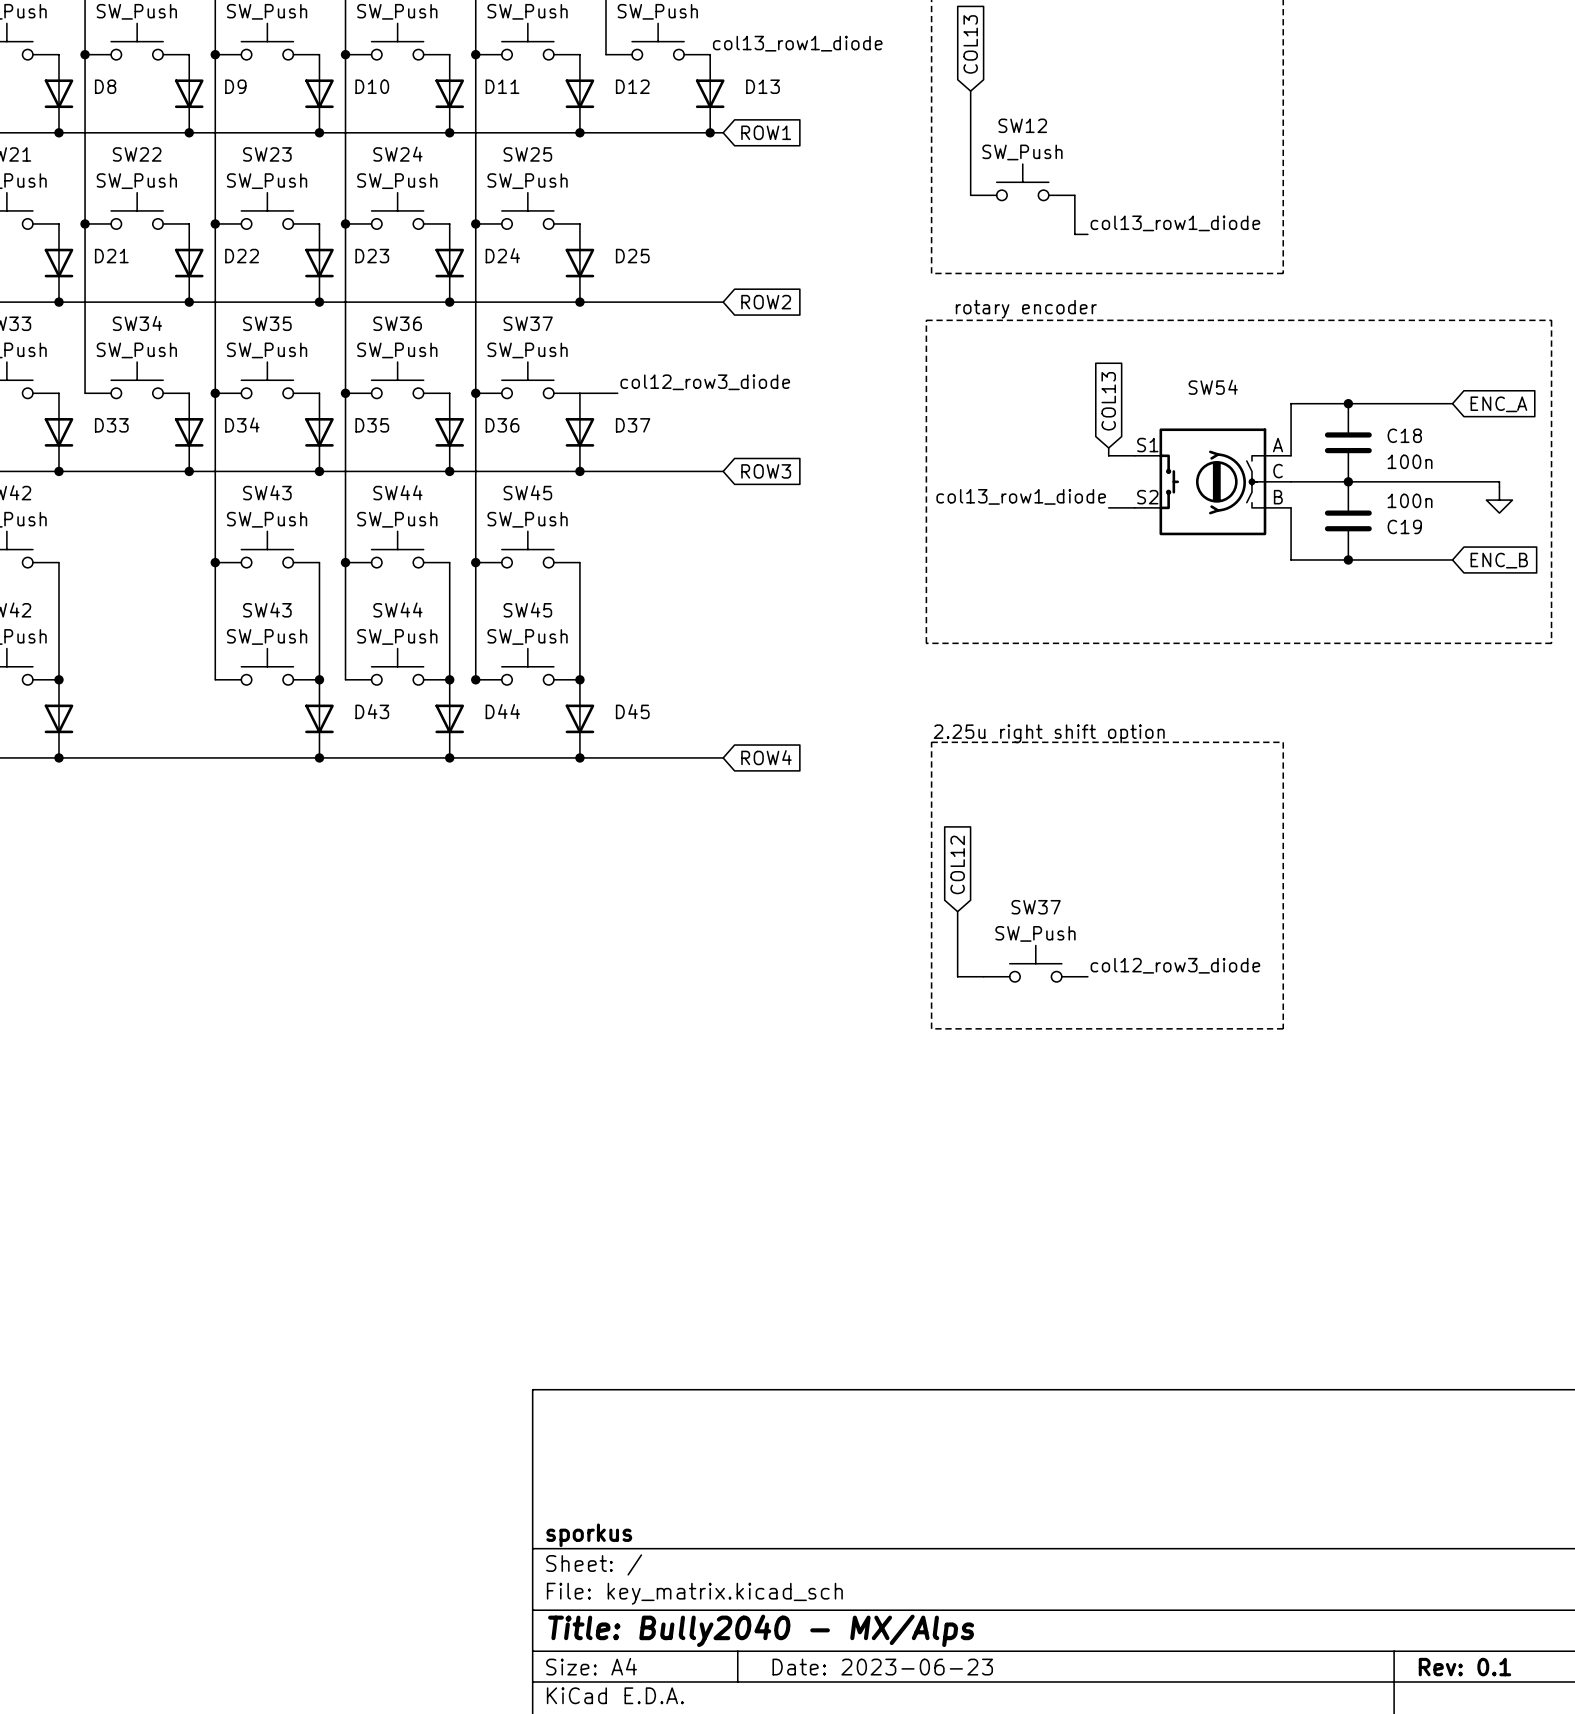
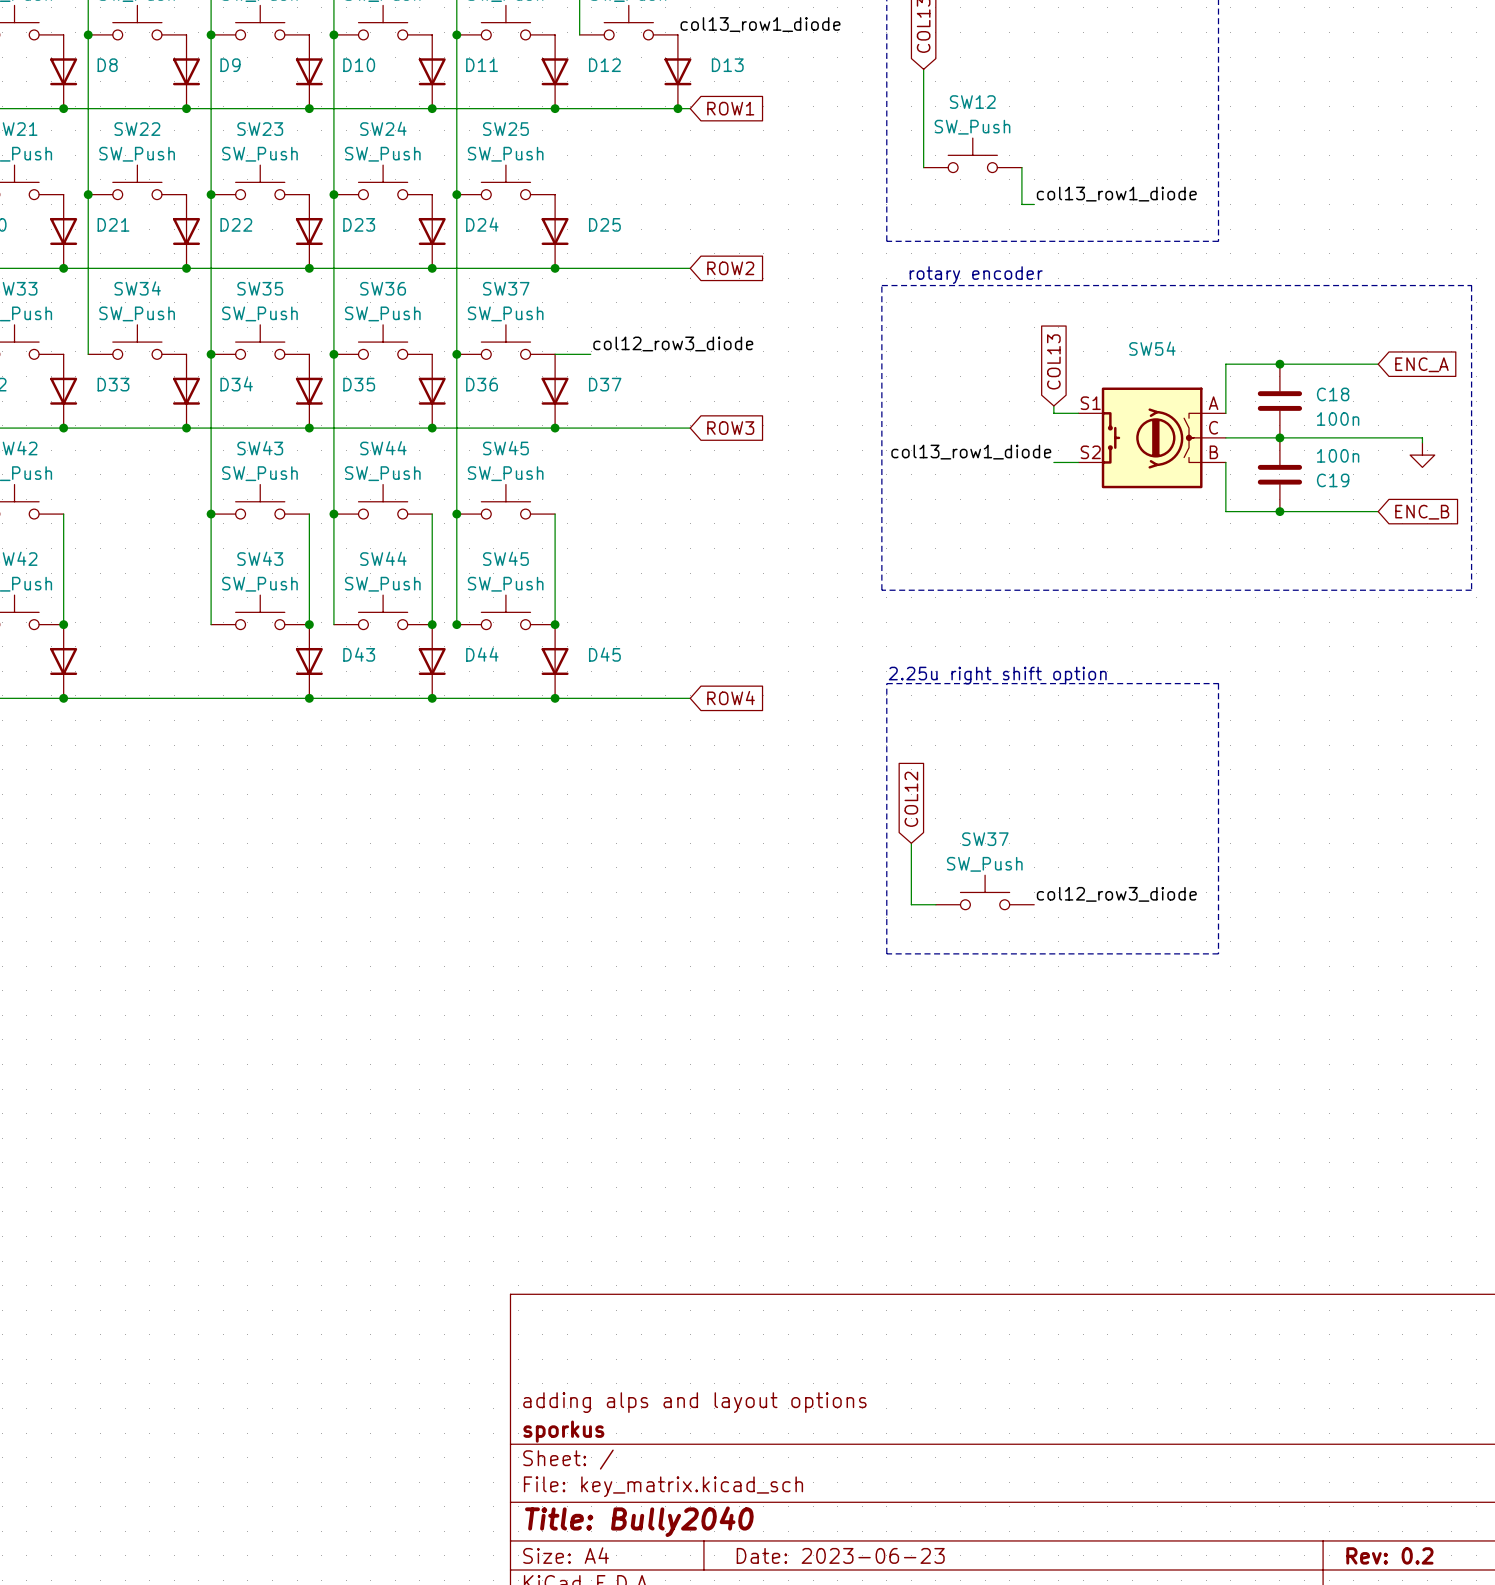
title block: none -> adding alps and layout options (694, 1402)
title block: Title: Bully2040 - MX/Alps (761, 1630) -> Title: Bully2040 (639, 1521)
title block: Rev: 0.1 (1464, 1667) -> Rev: 0.2 (1389, 1555)

